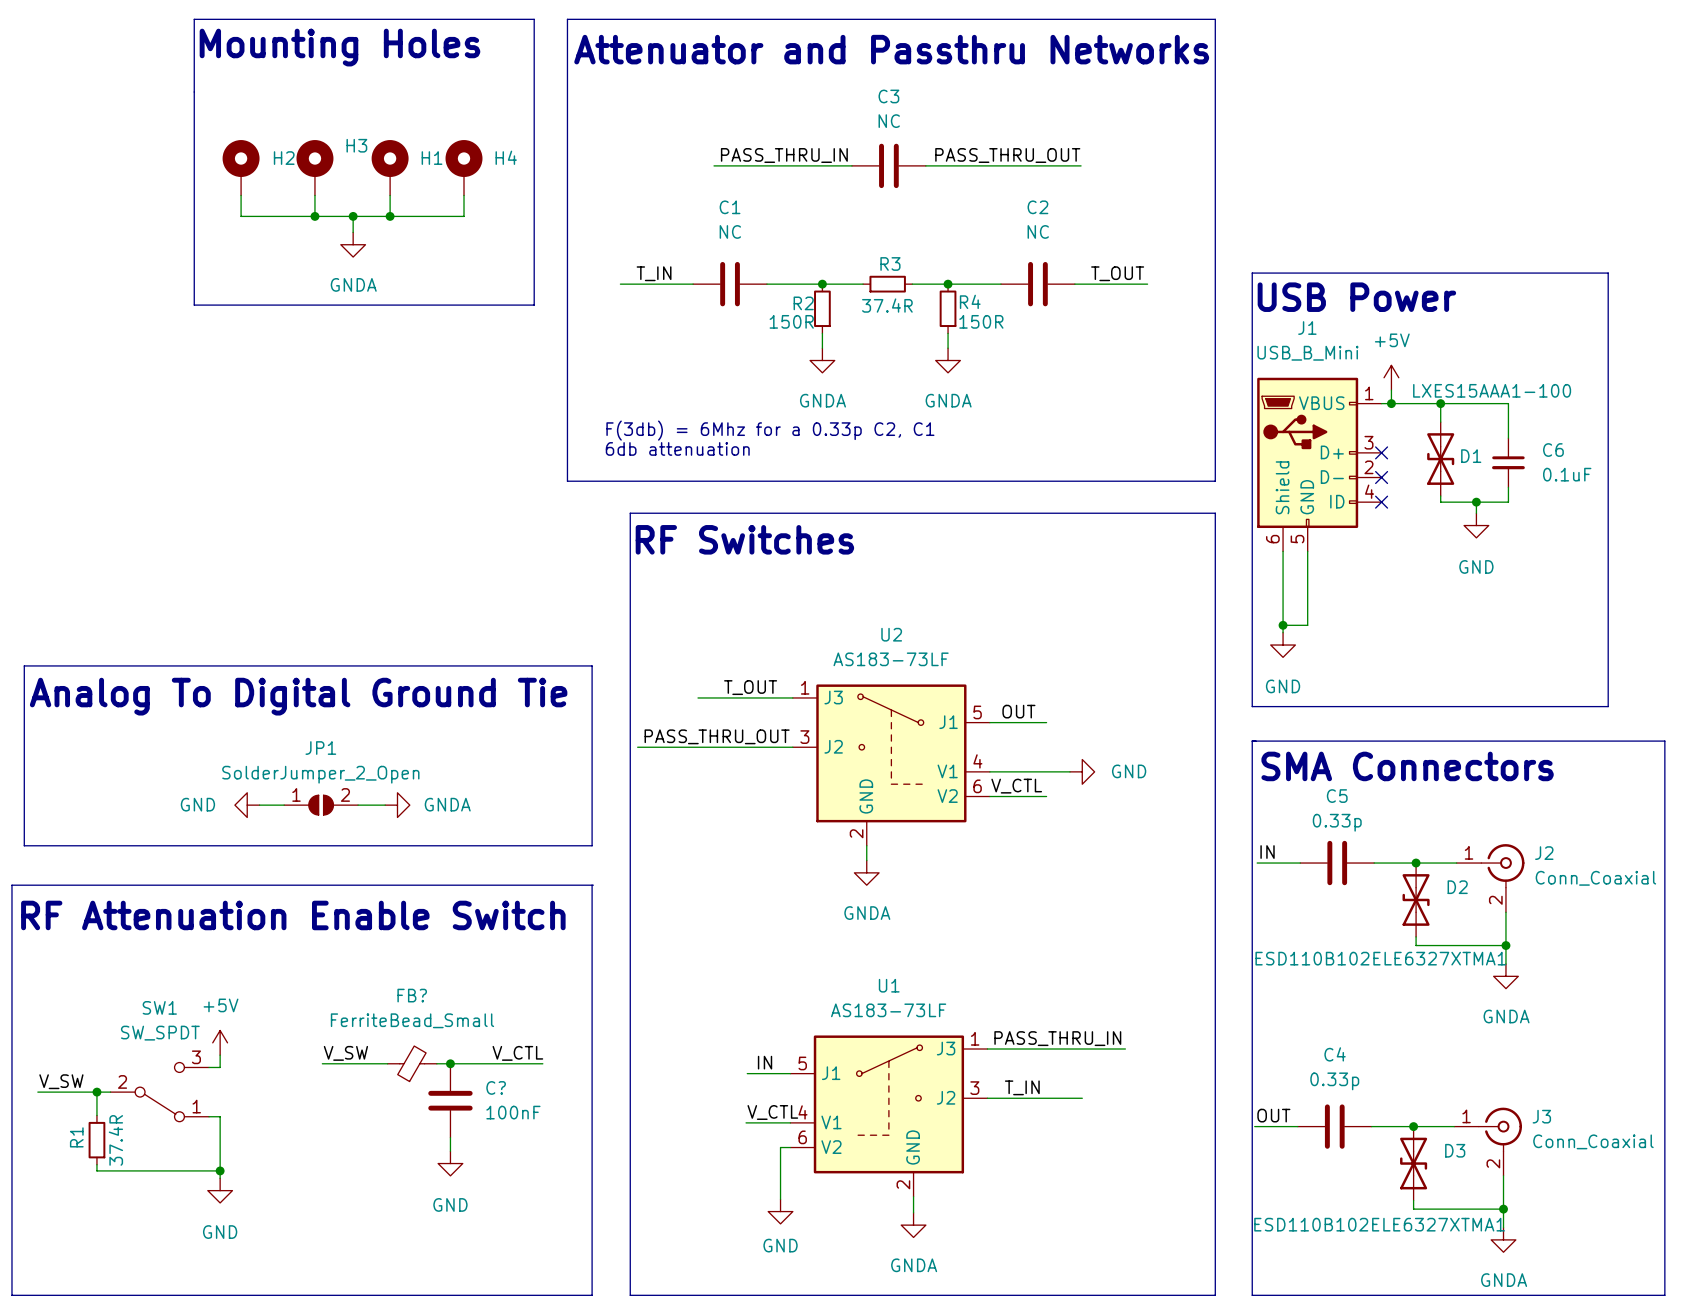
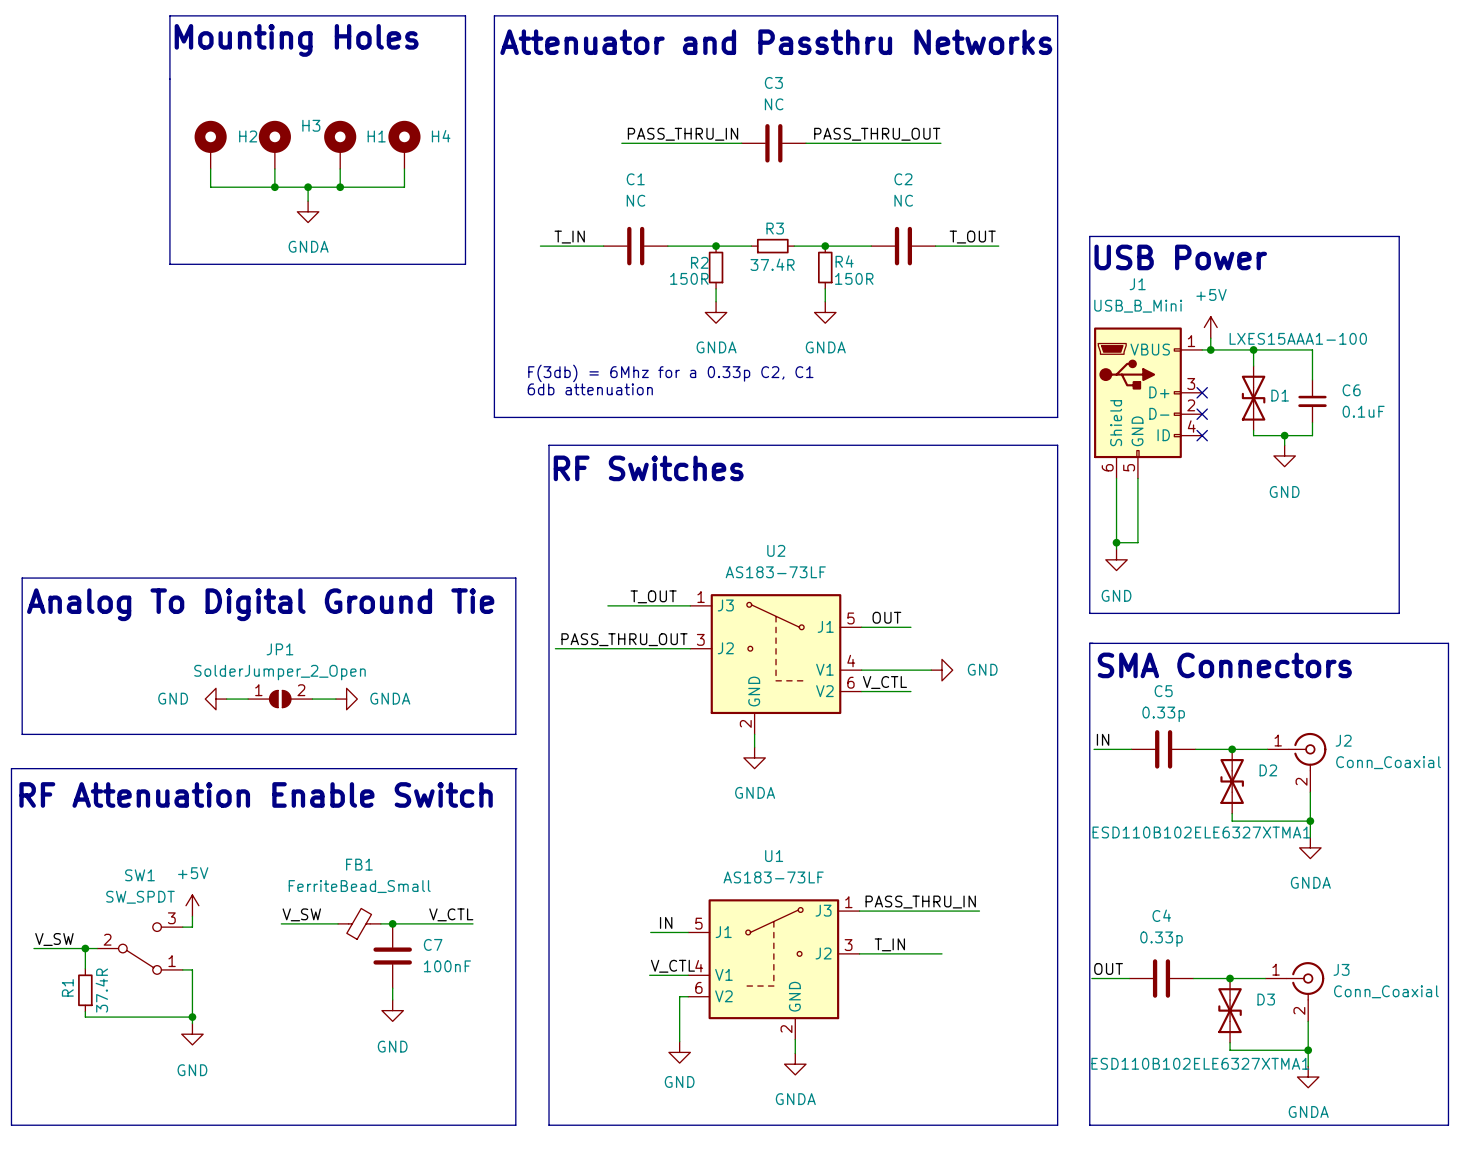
FB? name: FB? (412, 995) -> FB1 (359, 864)
C? name: C? (496, 1087) -> C7 (433, 944)

